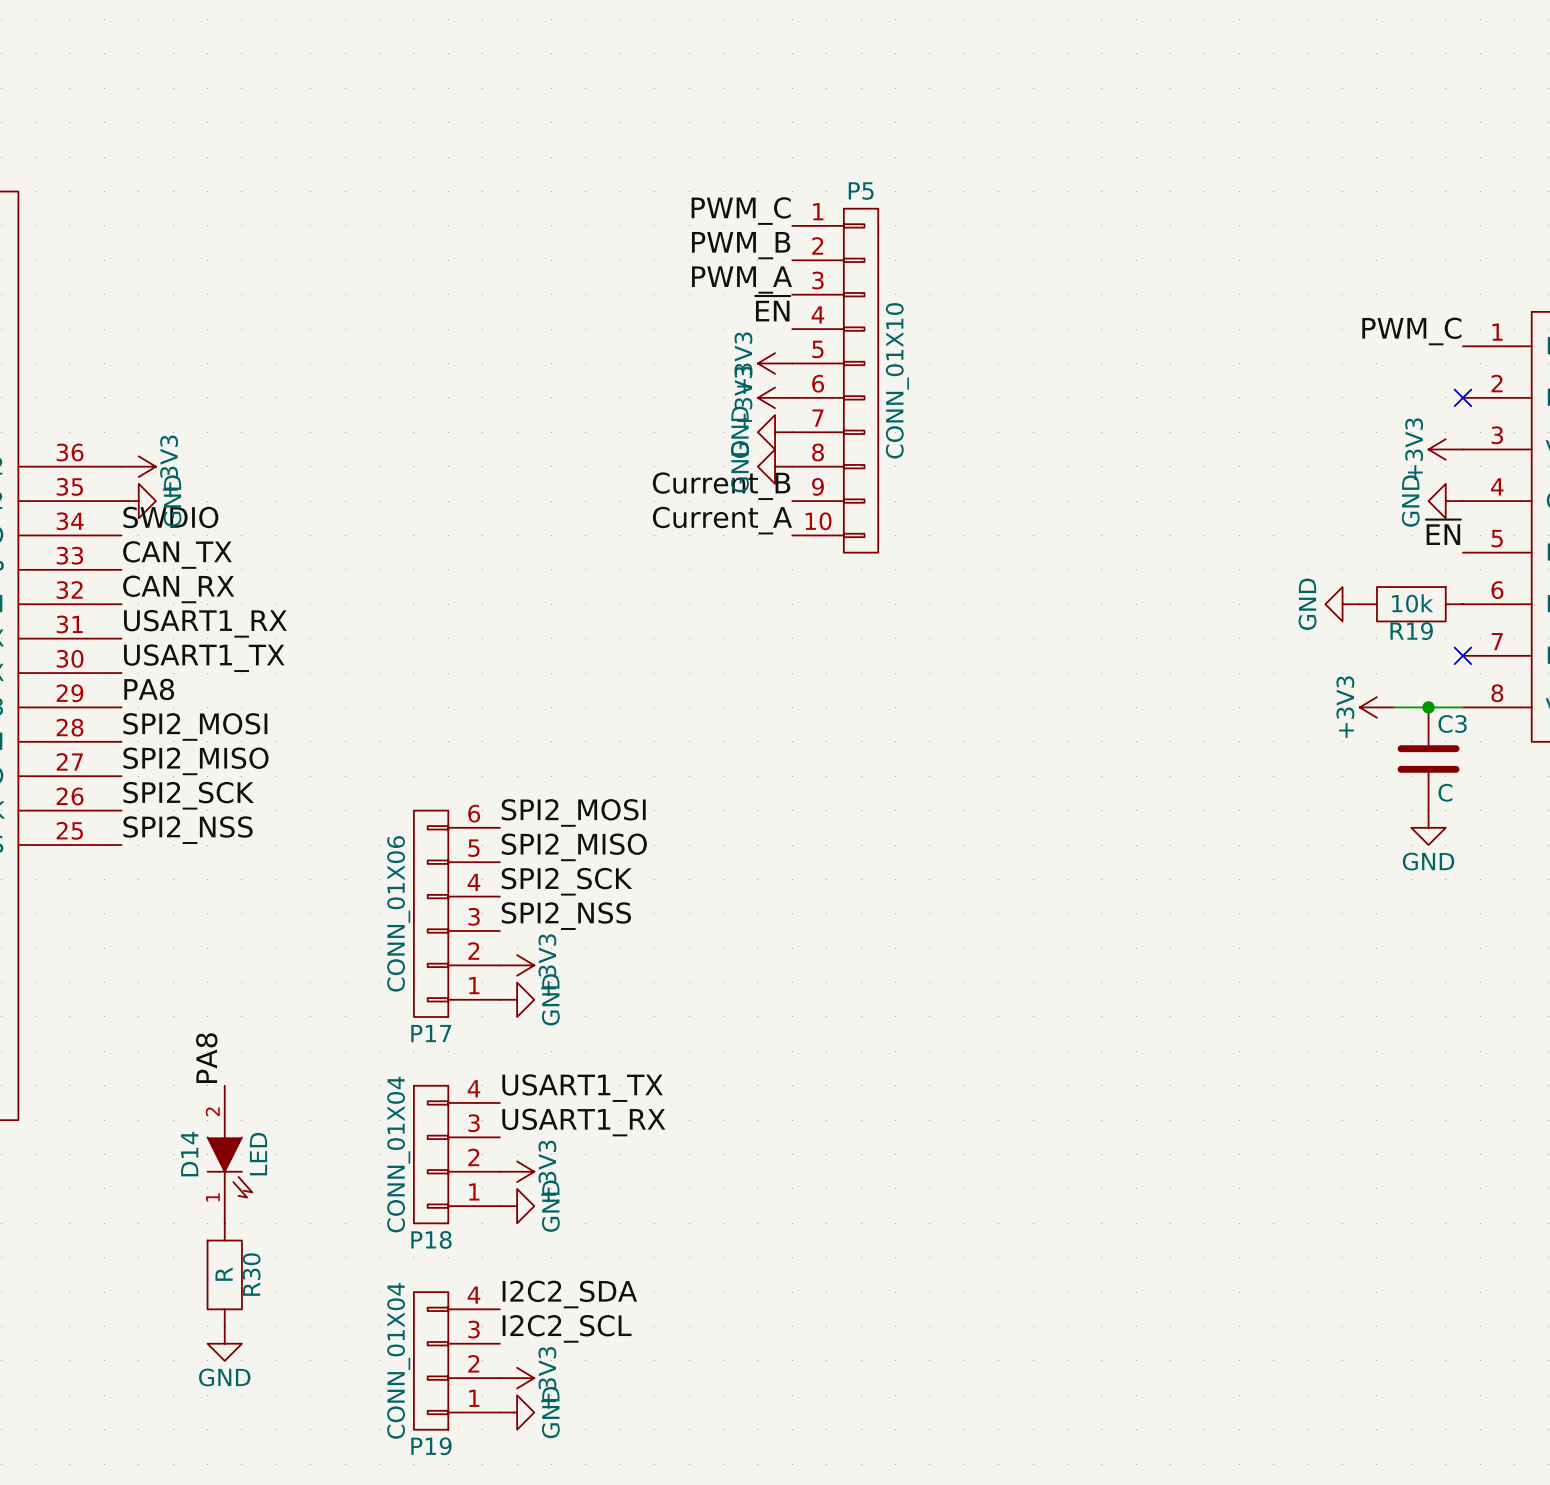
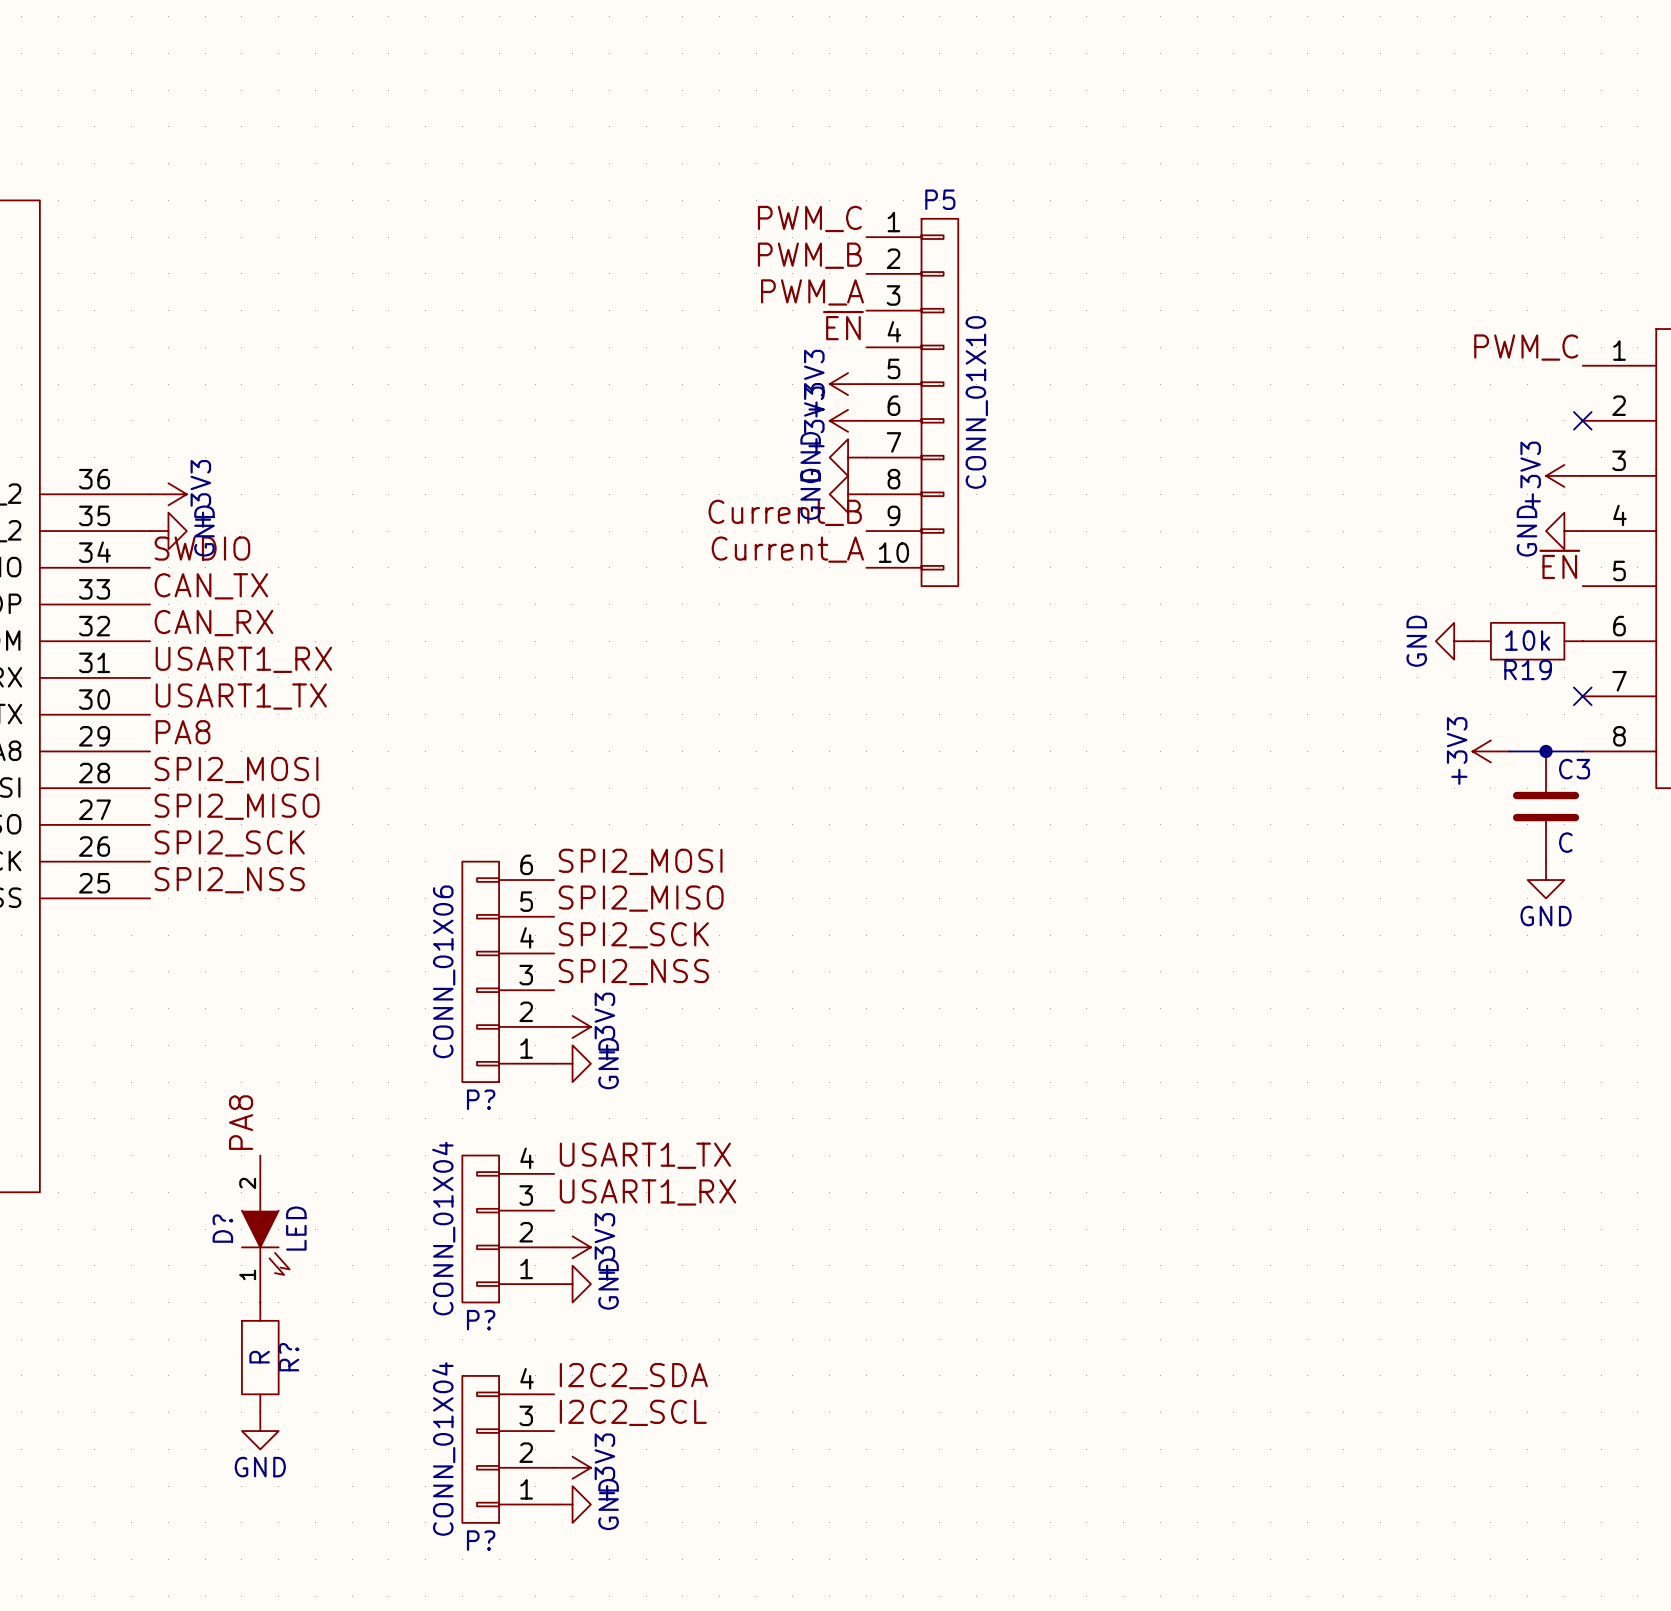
P17 name: P17 (431, 1033) -> P? (481, 1099)
D14 name: D14 (189, 1154) -> D? (222, 1228)
P18 name: P18 (431, 1239) -> P? (481, 1320)
R30 name: R30 (251, 1274) -> R? (288, 1357)
P19 name: P19 (431, 1446) -> P? (481, 1540)

